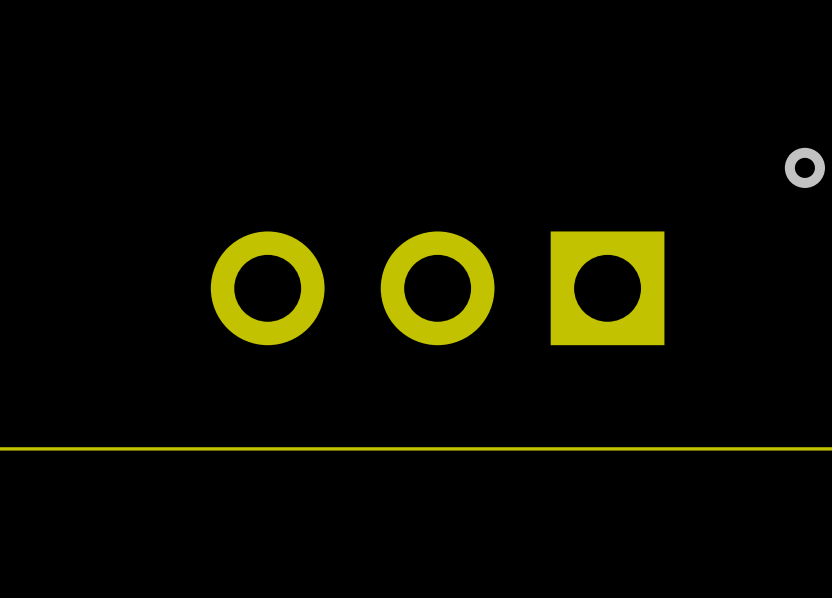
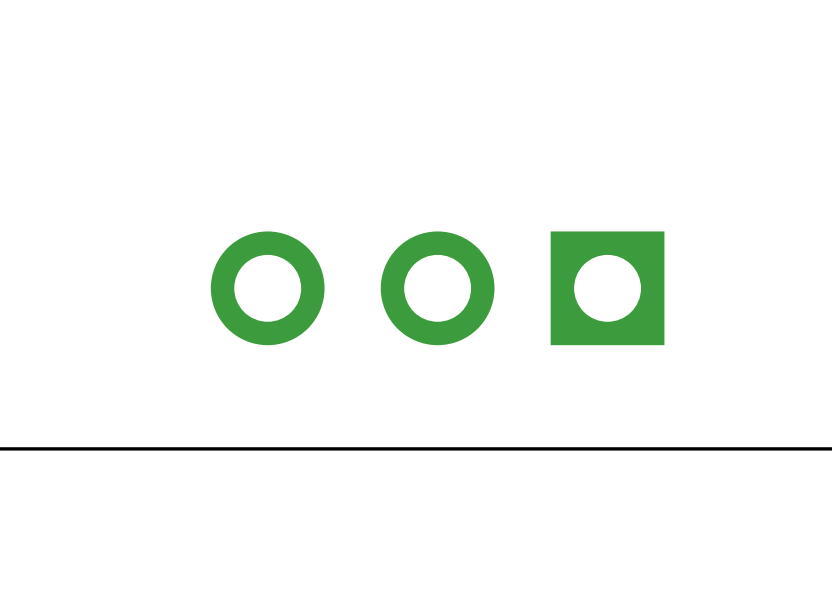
via: (804, 167) -> none

